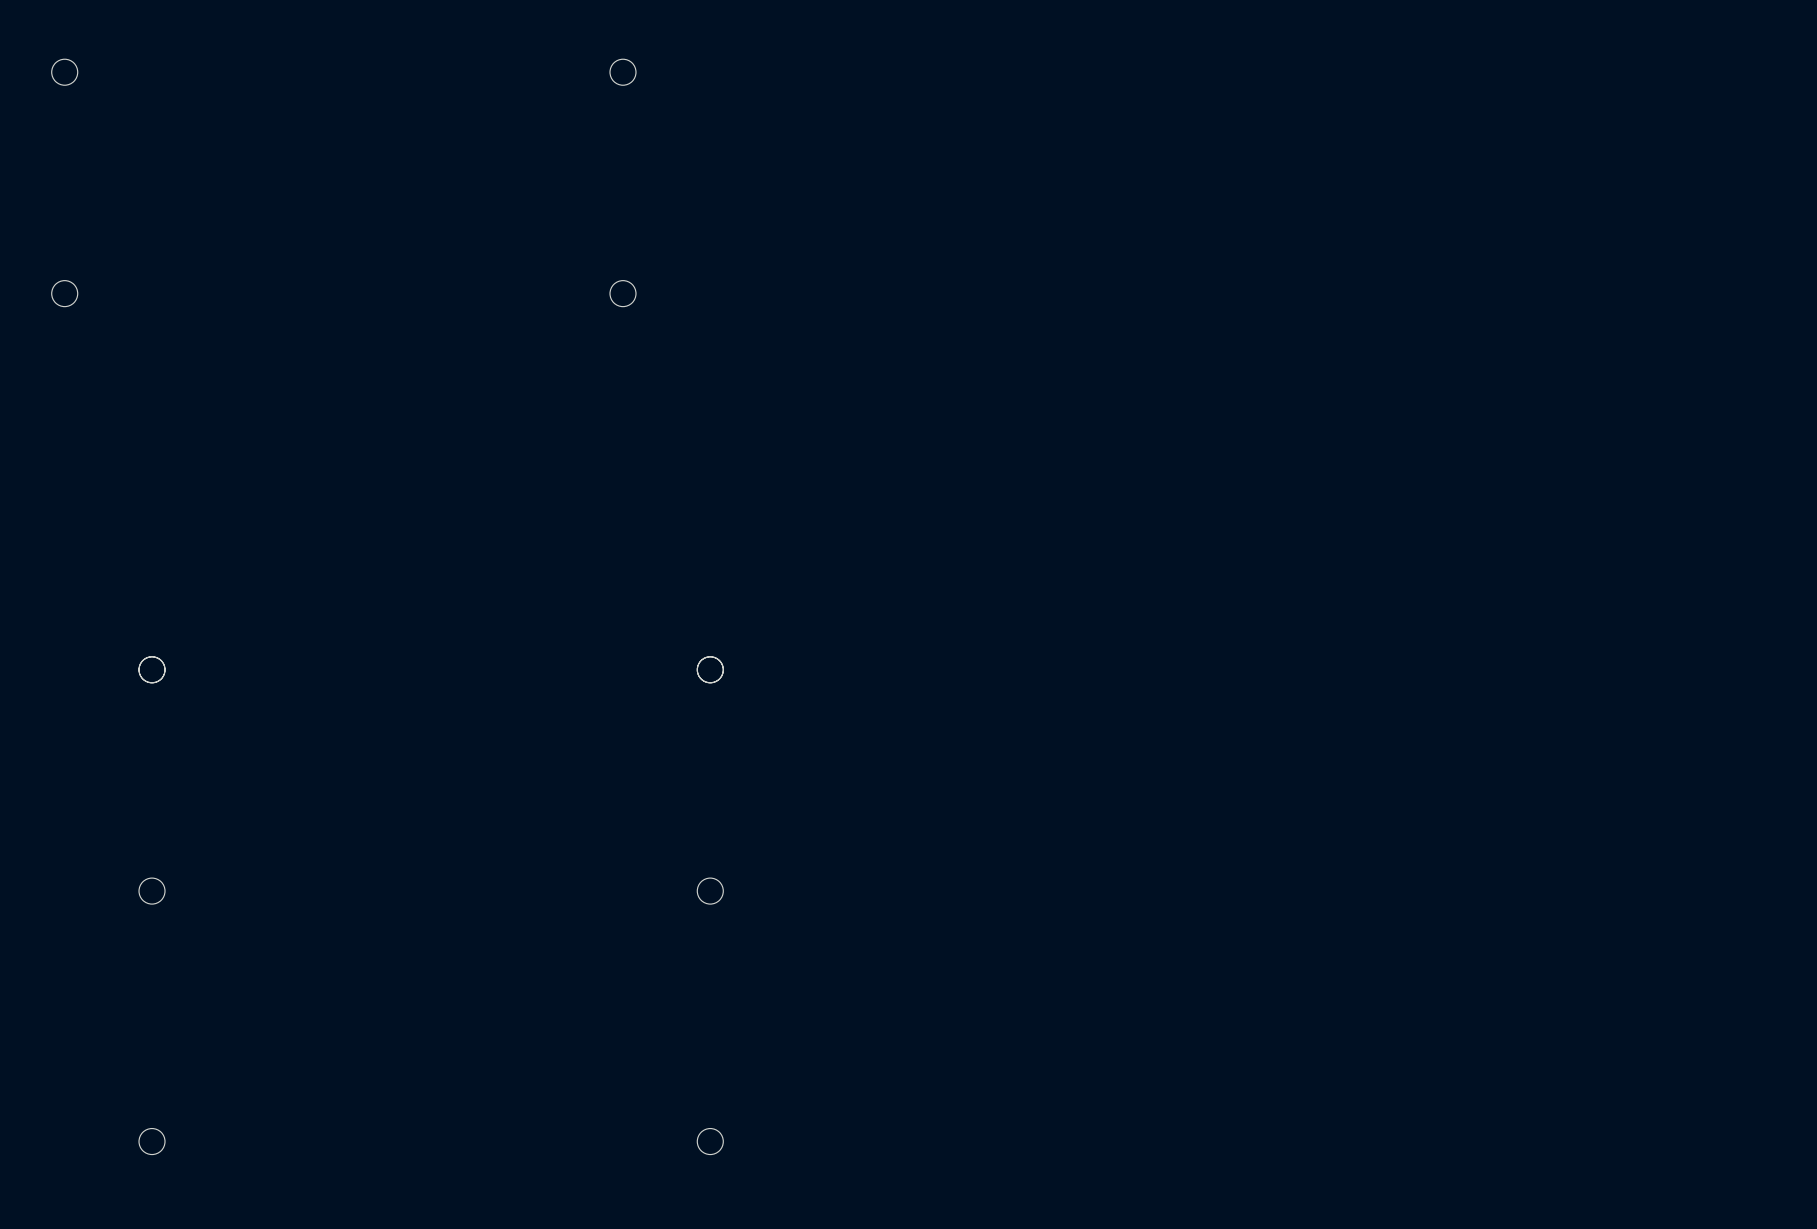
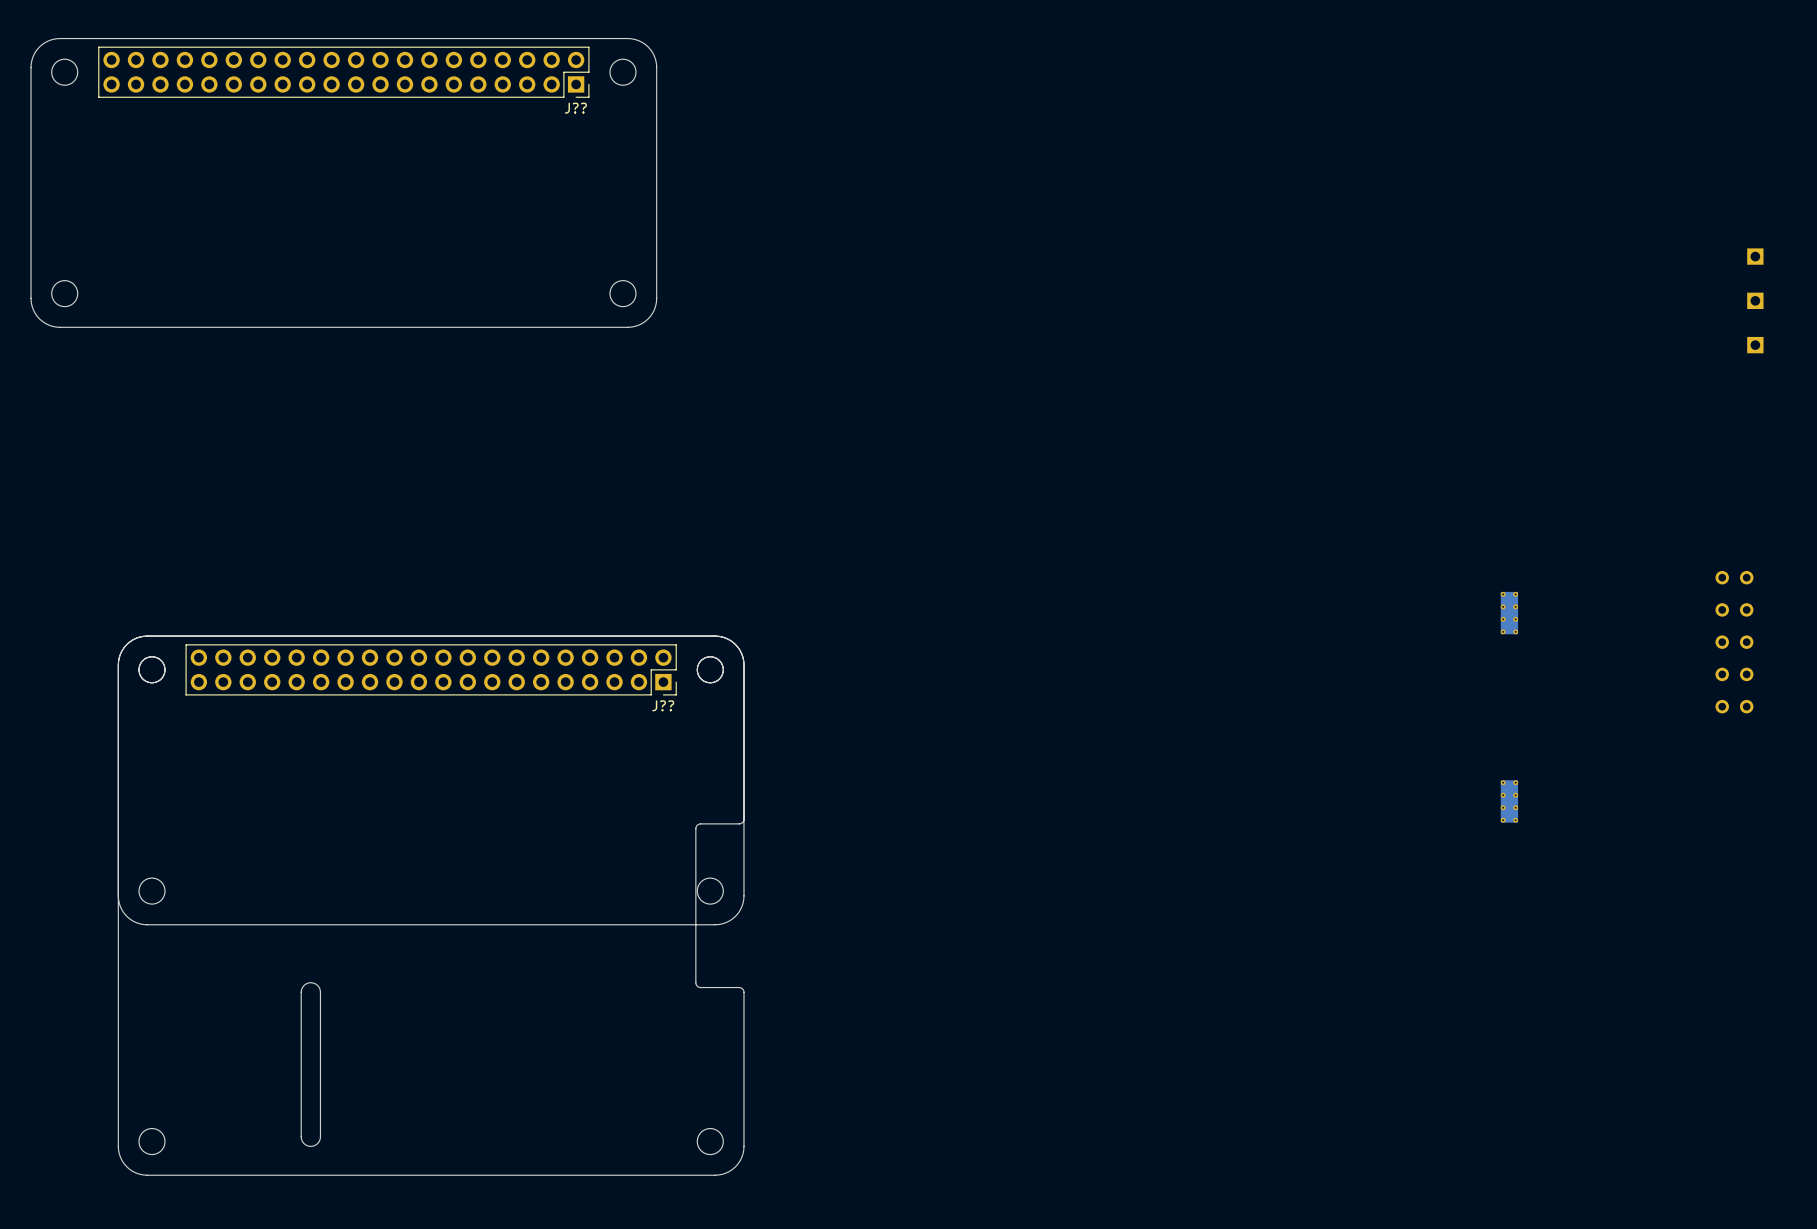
board edge: none -> (627, 38) (59, 38) (48, 40) (34, 52) (31, 67) (31, 298) (33, 309) (42, 321) (59, 327) (627, 327) (638, 325) (650, 316) (656, 302) (656, 67) (654, 56) (648, 47) (638, 40) (627, 38)
J??: none -> (343, 72)
part: none -> (1755, 256)
part: none -> (1755, 300)
part: none -> (1755, 345)
part: none -> (1734, 577)
part: none -> (1734, 609)
part: none -> (1509, 613)
part: none -> (1734, 642)
board edge: none -> (743, 665) (741, 654) (735, 644) (726, 638) (715, 636) (147, 636) (136, 638) (126, 644) (120, 654) (118, 665)
J??: none -> (431, 669)
part: none -> (1734, 674)
part: none -> (1734, 706)
part: none -> (1509, 801)
board edge: none -> (743, 819) (743, 819) (743, 820) (742, 822) (739, 823) (700, 823) (695, 828) (695, 828) (695, 982) (696, 983) (700, 987) (739, 987) (743, 991) (743, 1150) (735, 1166) (718, 1174) (147, 1175) (129, 1169) (120, 1157) (118, 1146) (118, 664) (120, 653) (126, 644) (136, 638) (147, 636) (715, 636) (726, 638) (738, 647) (743, 661) (743, 664) (743, 895) (738, 913) (726, 922) (715, 924) (147, 924) (136, 922) (126, 916) (120, 906) (118, 899) (118, 895)
board edge: none -> (320, 992) (320, 1137) (317, 1143) (309, 1146) (303, 1143) (301, 1136) (301, 991) (304, 985) (310, 982) (318, 985) (320, 992)

